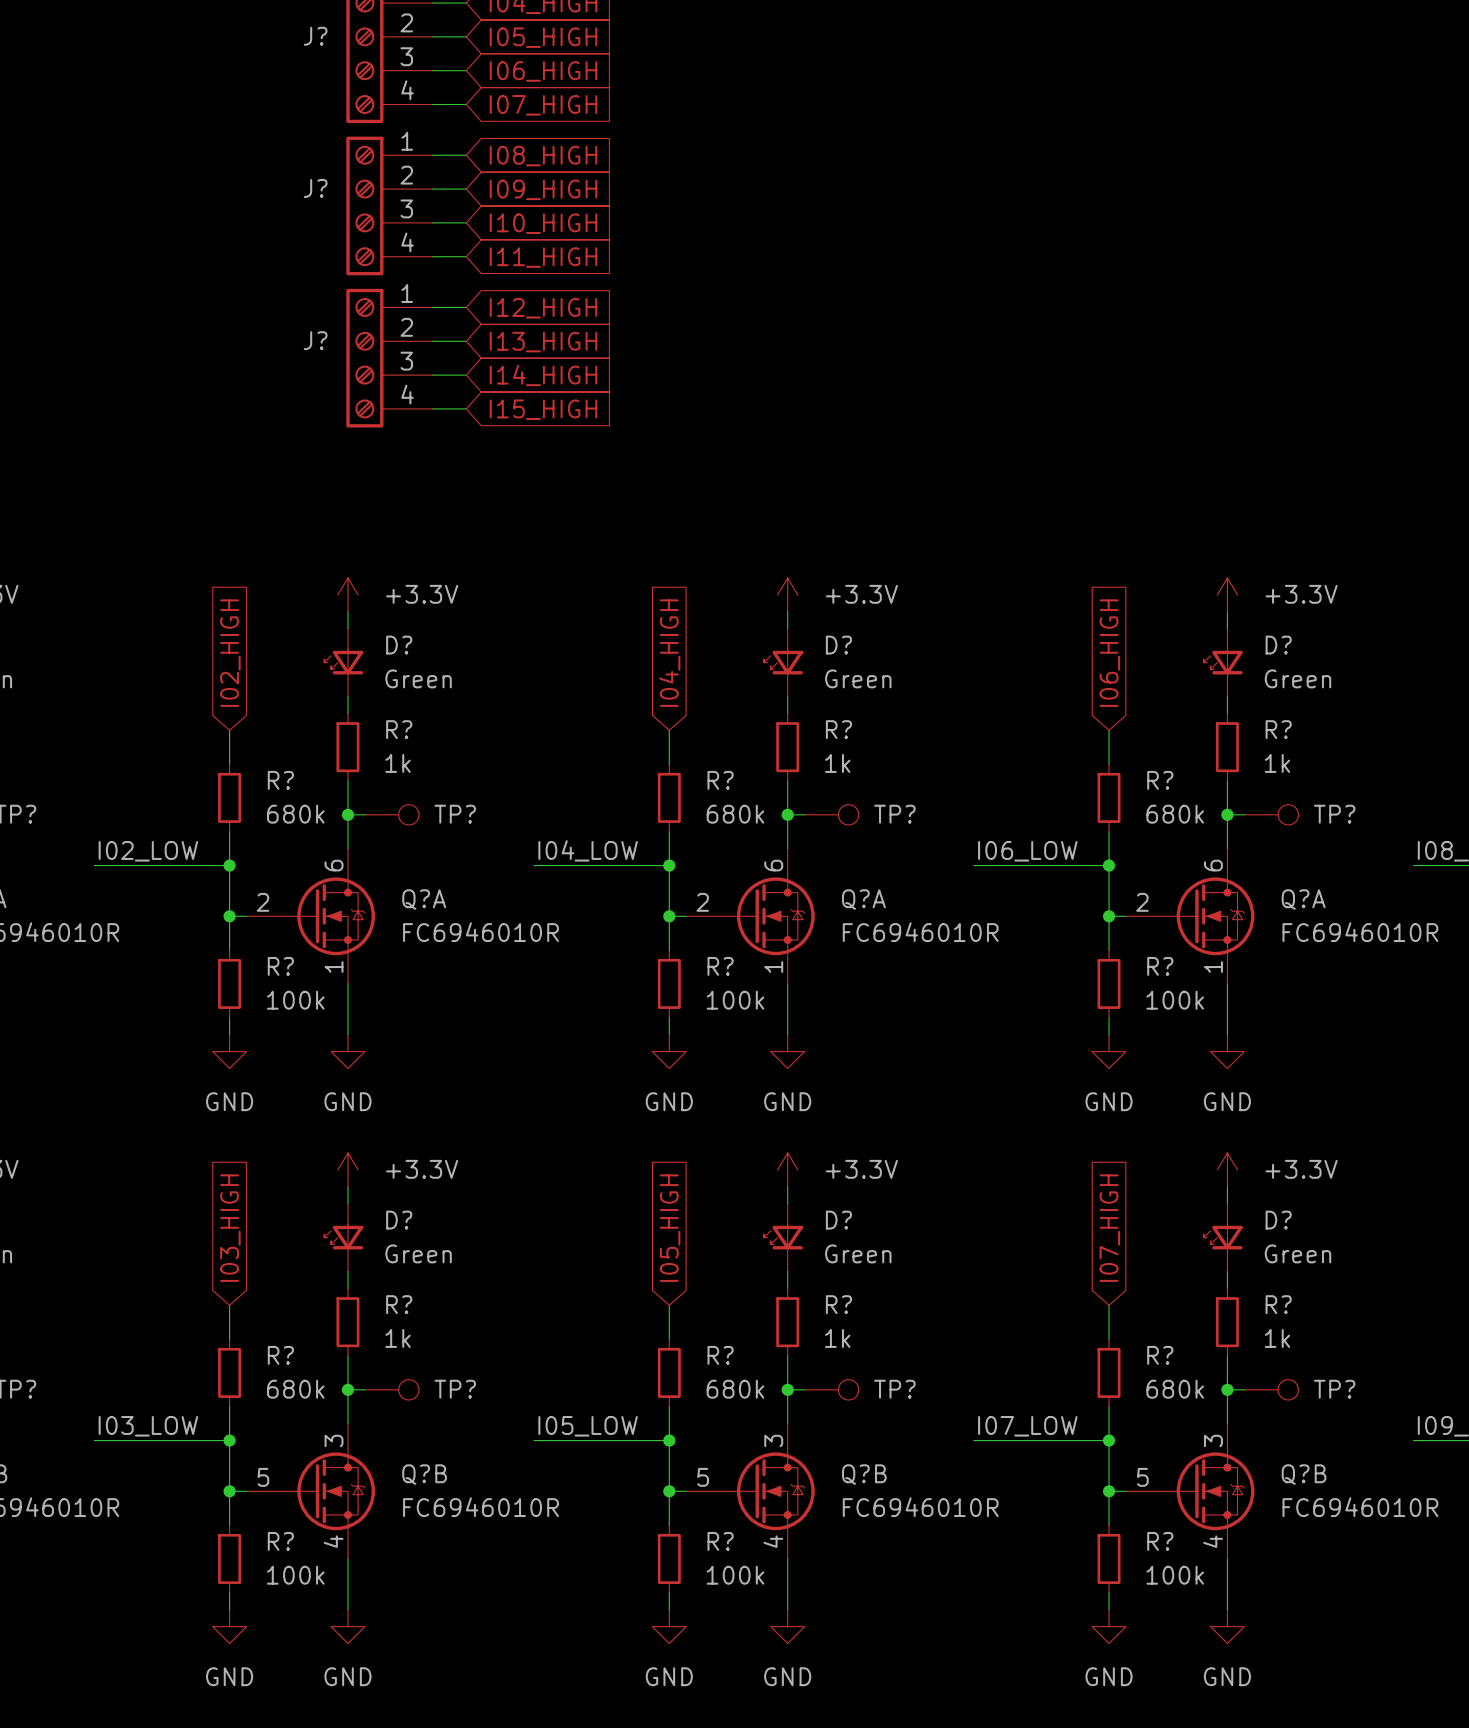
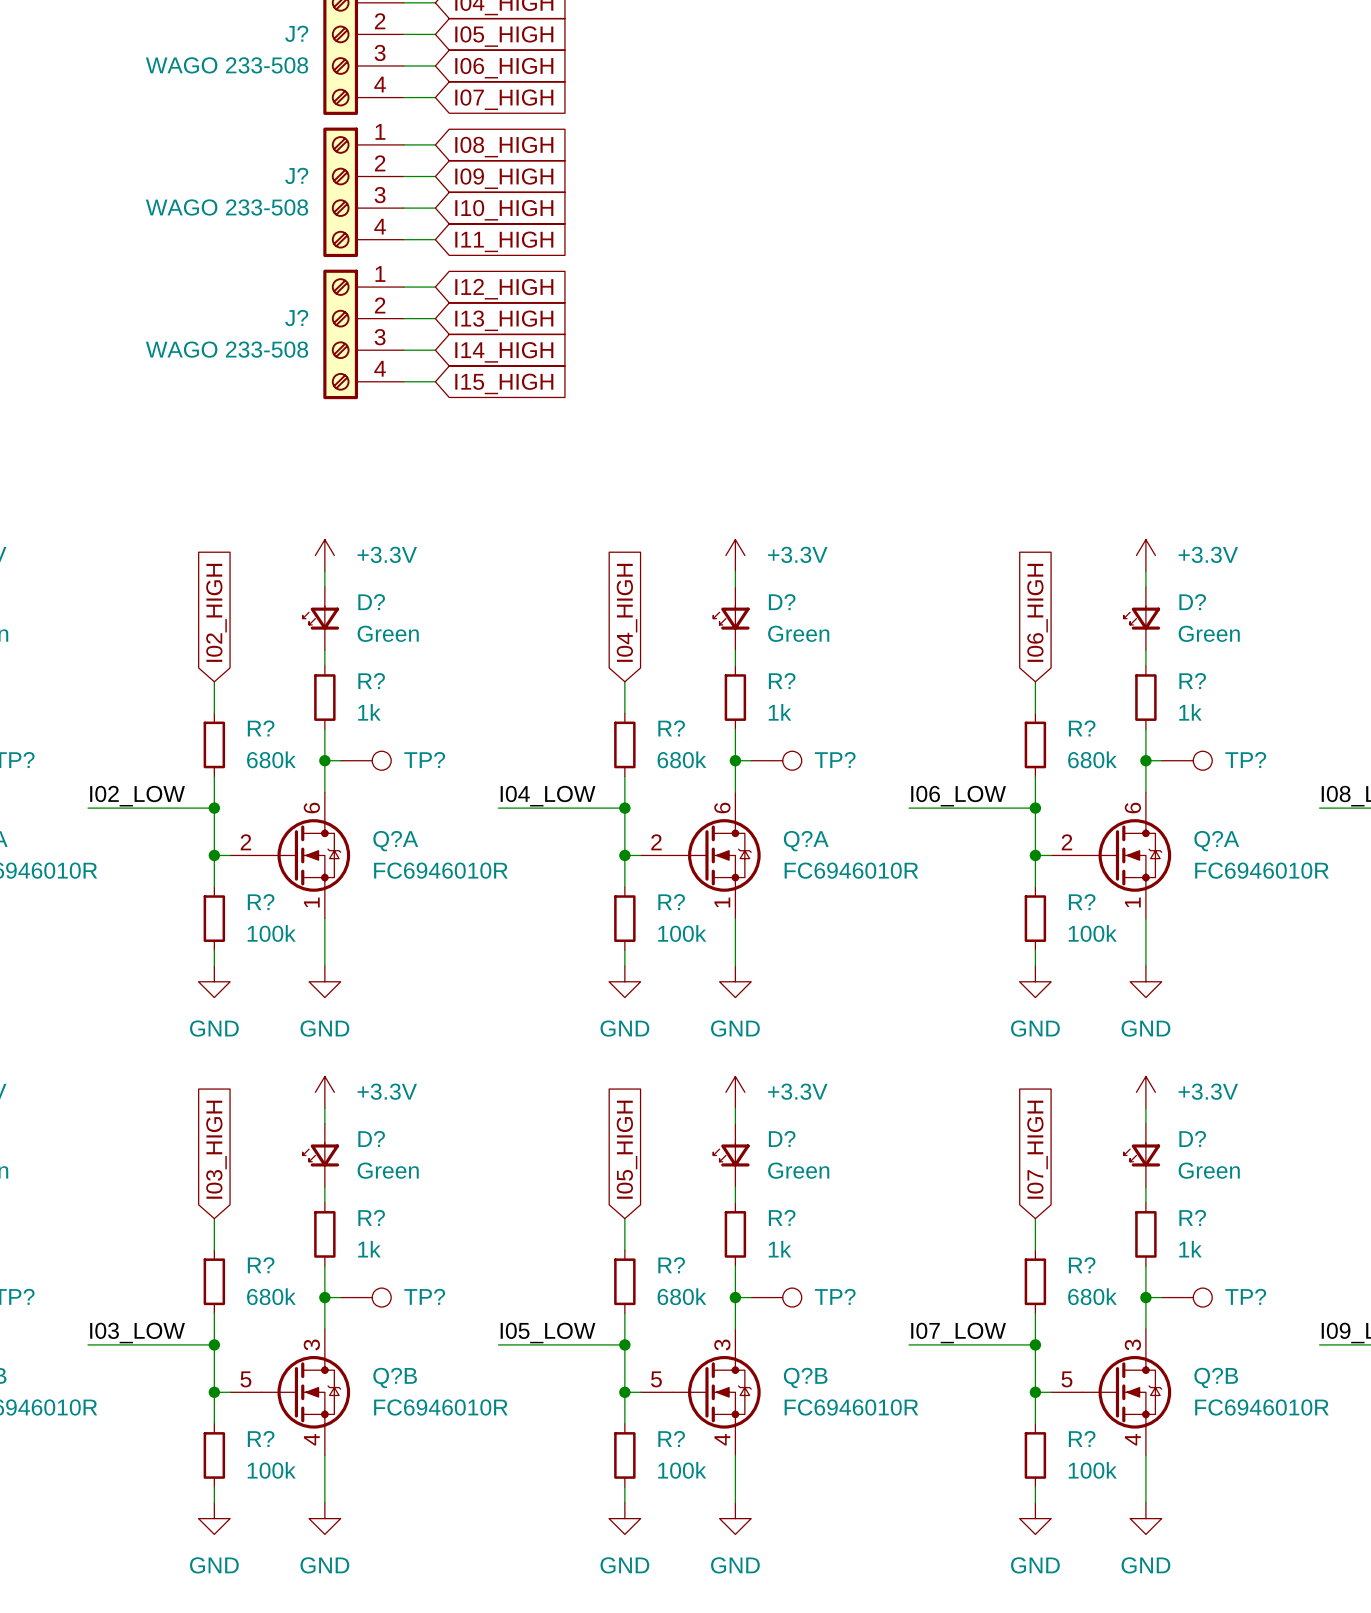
J? value: none -> WAGO 233-508 (226, 65)
J? value: none -> WAGO 233-508 (226, 207)
J? value: none -> WAGO 233-508 (226, 349)

